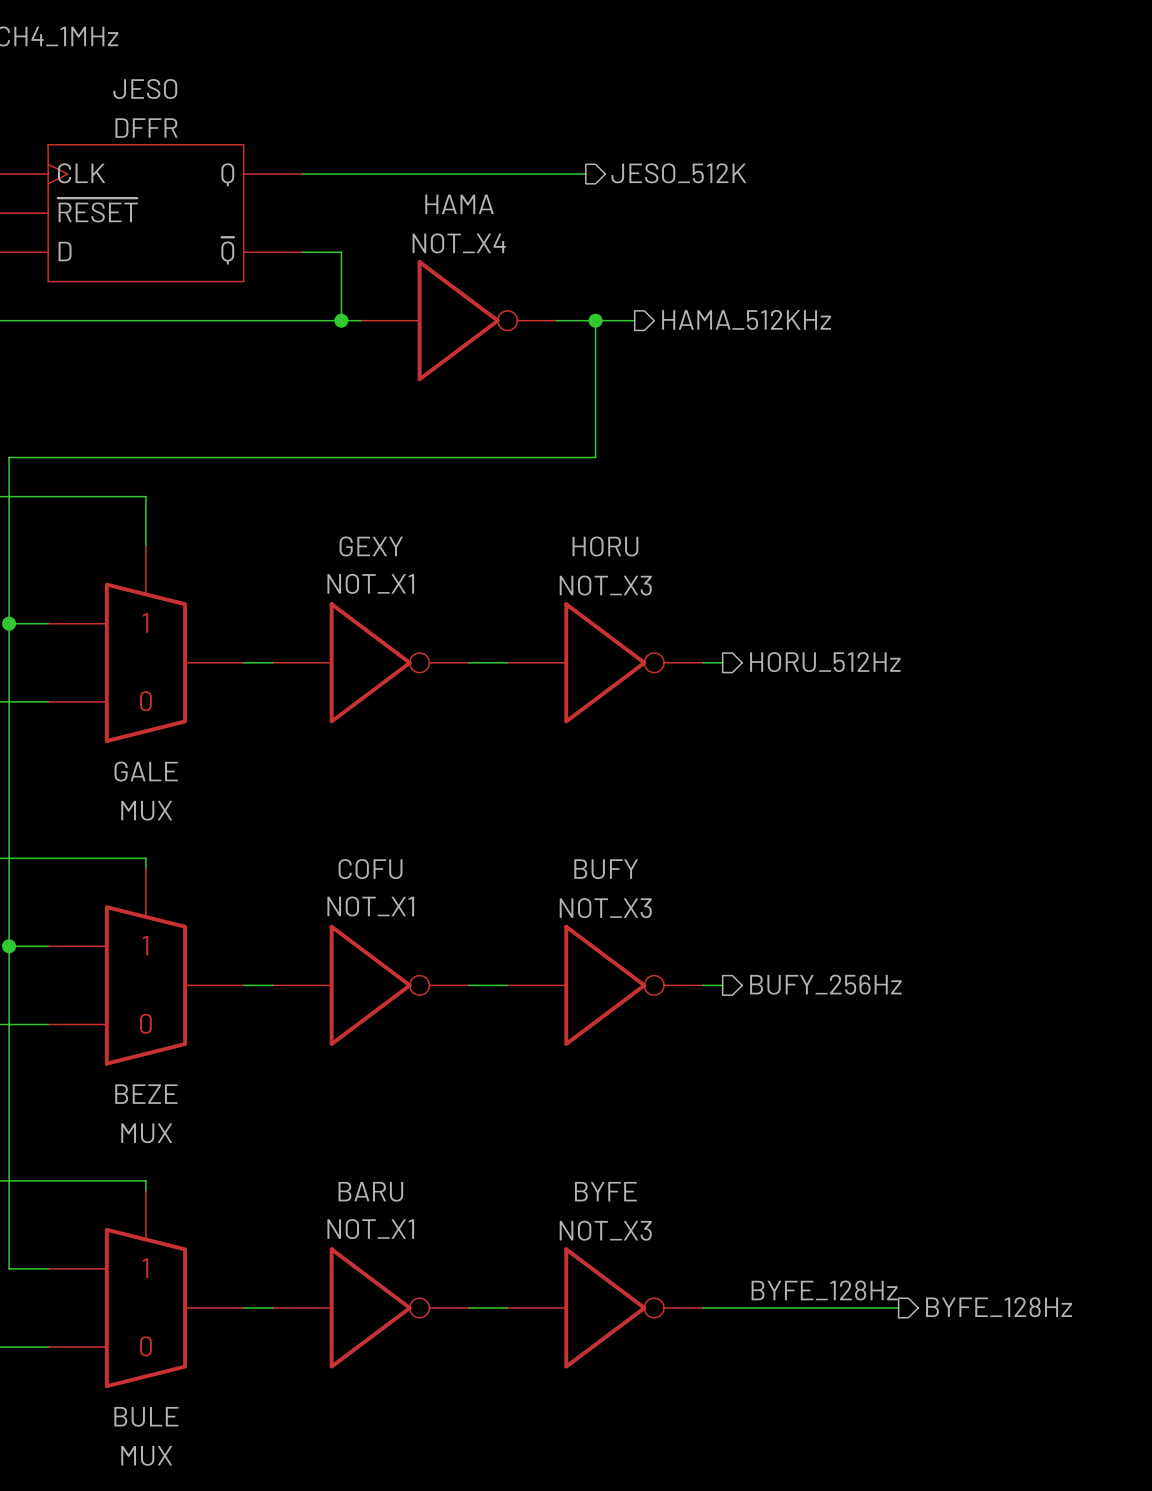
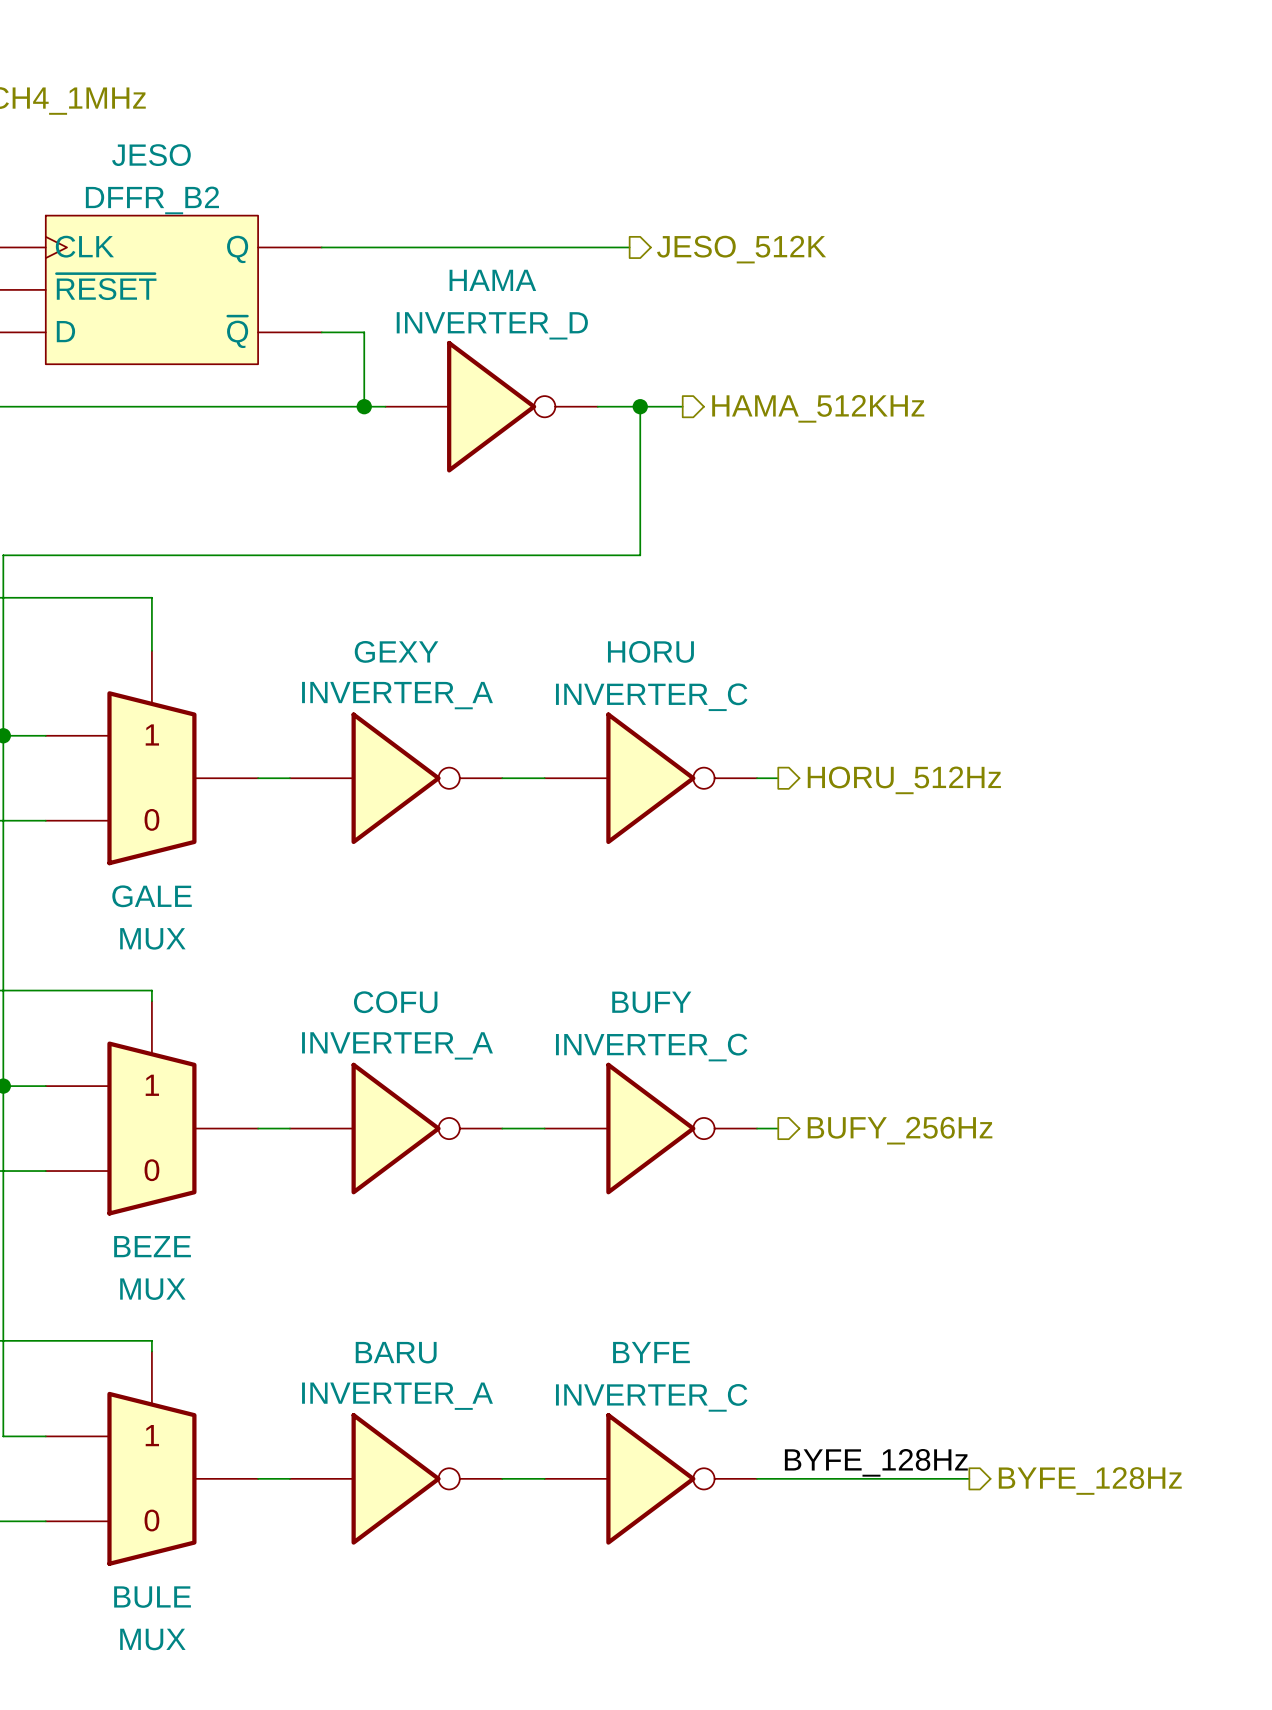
JESO value: DFFR (146, 128) -> DFFR_B2 (152, 200)
HAMA value: NOT_X4 (459, 243) -> INVERTER_D (492, 325)
GEXY value: NOT_X1 (370, 583) -> INVERTER_A (397, 695)
HORU value: NOT_X3 (605, 585) -> INVERTER_C (651, 697)
COFU value: NOT_X1 (370, 906) -> INVERTER_A (397, 1045)
BUFY value: NOT_X3 (605, 908) -> INVERTER_C (651, 1047)
BARU value: NOT_X1 (370, 1229) -> INVERTER_A (397, 1396)
BYFE value: NOT_X3 (605, 1230) -> INVERTER_C (651, 1397)

